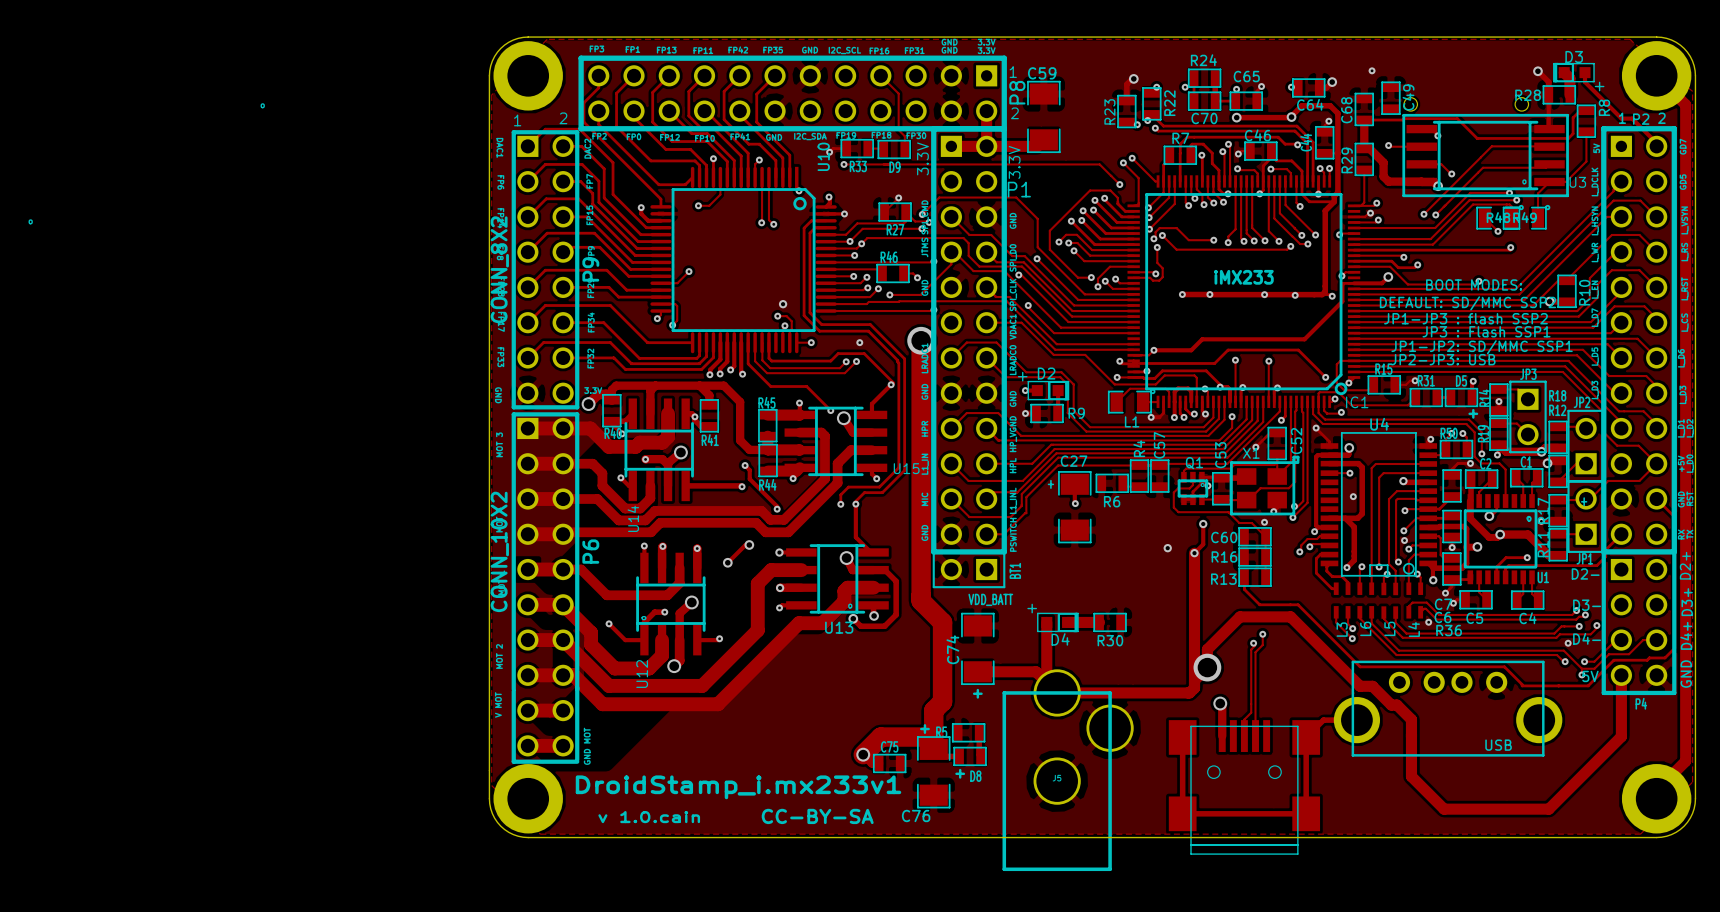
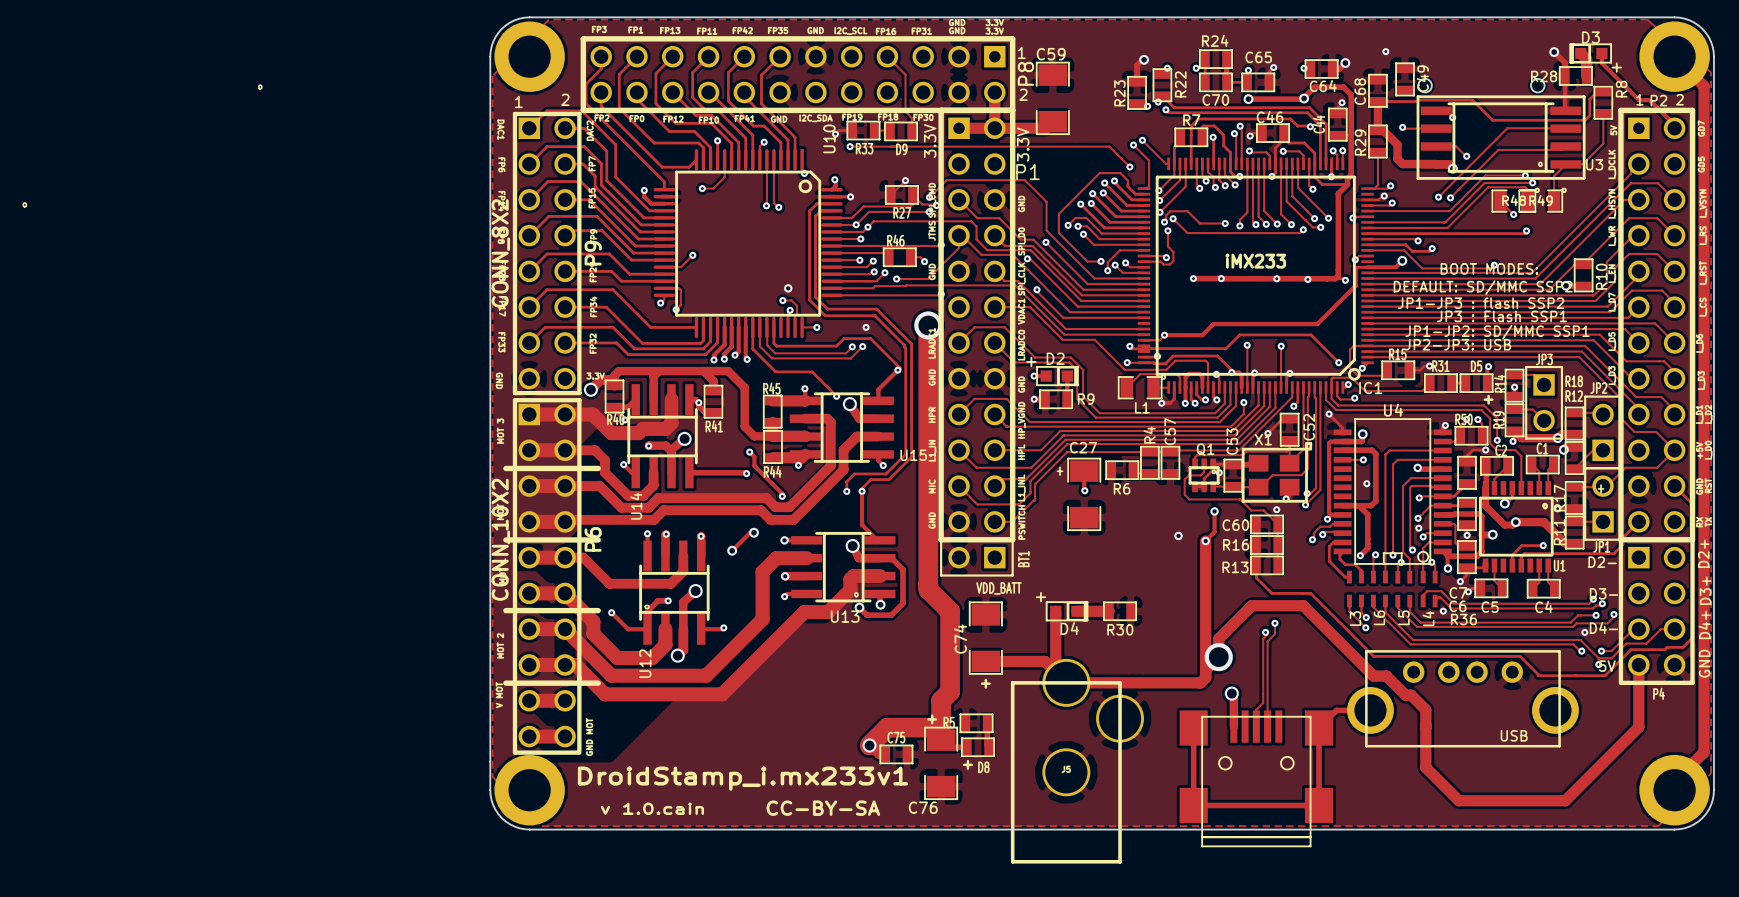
line: none -> (505, 468) (598, 468)
line: none -> (505, 539) (598, 539)
line: none -> (505, 610) (598, 610)
line: none -> (505, 683) (598, 683)

